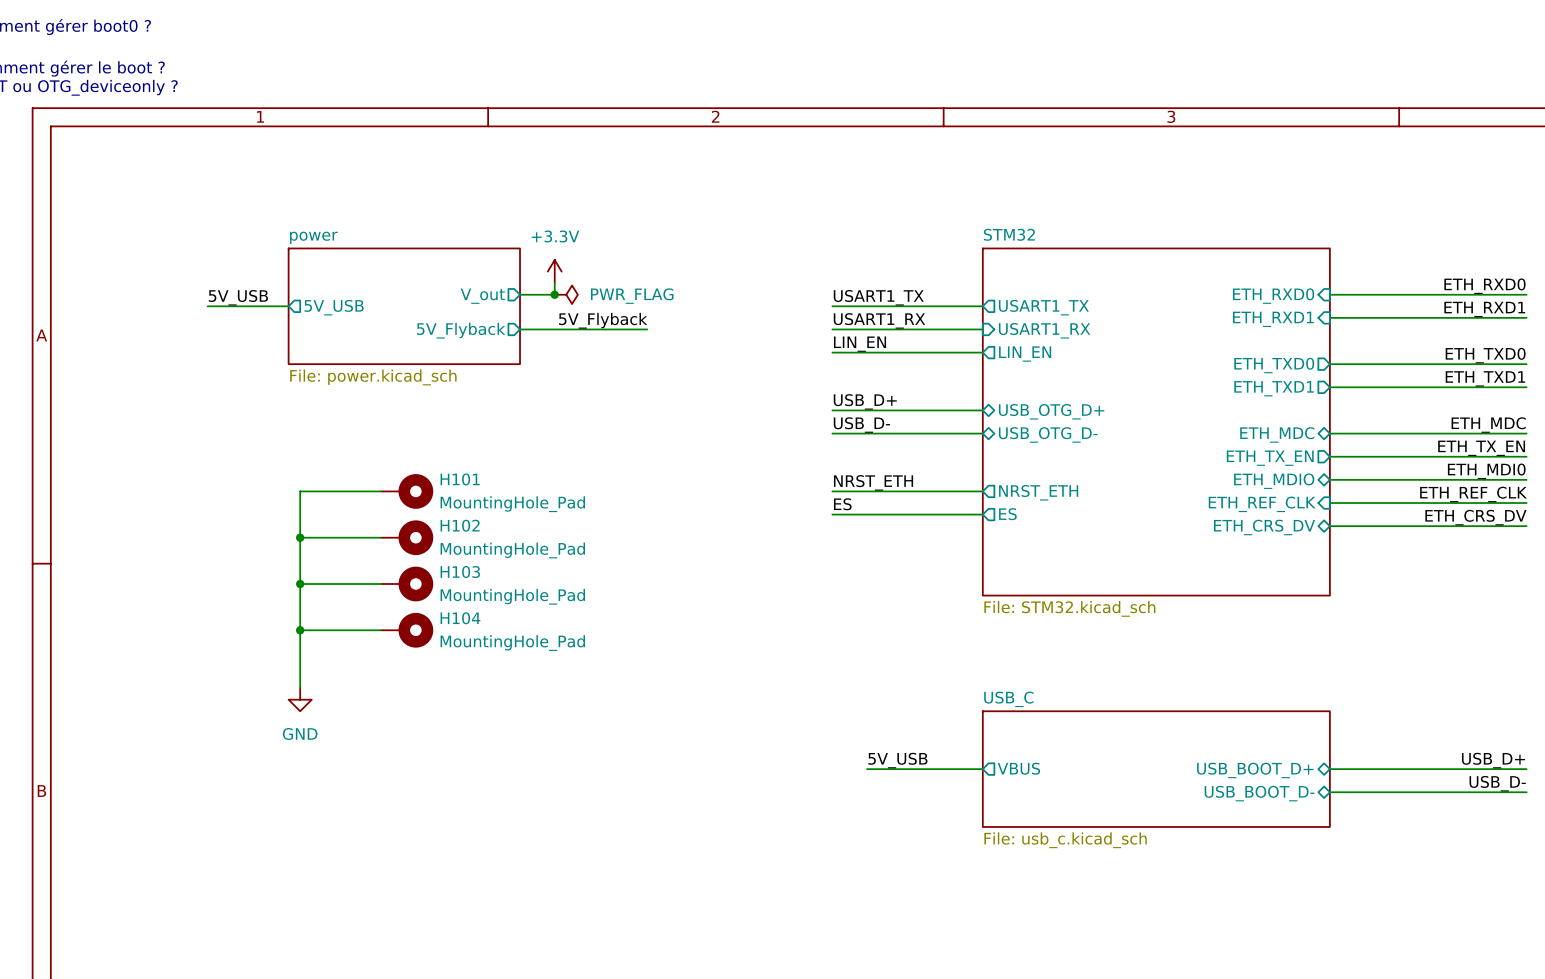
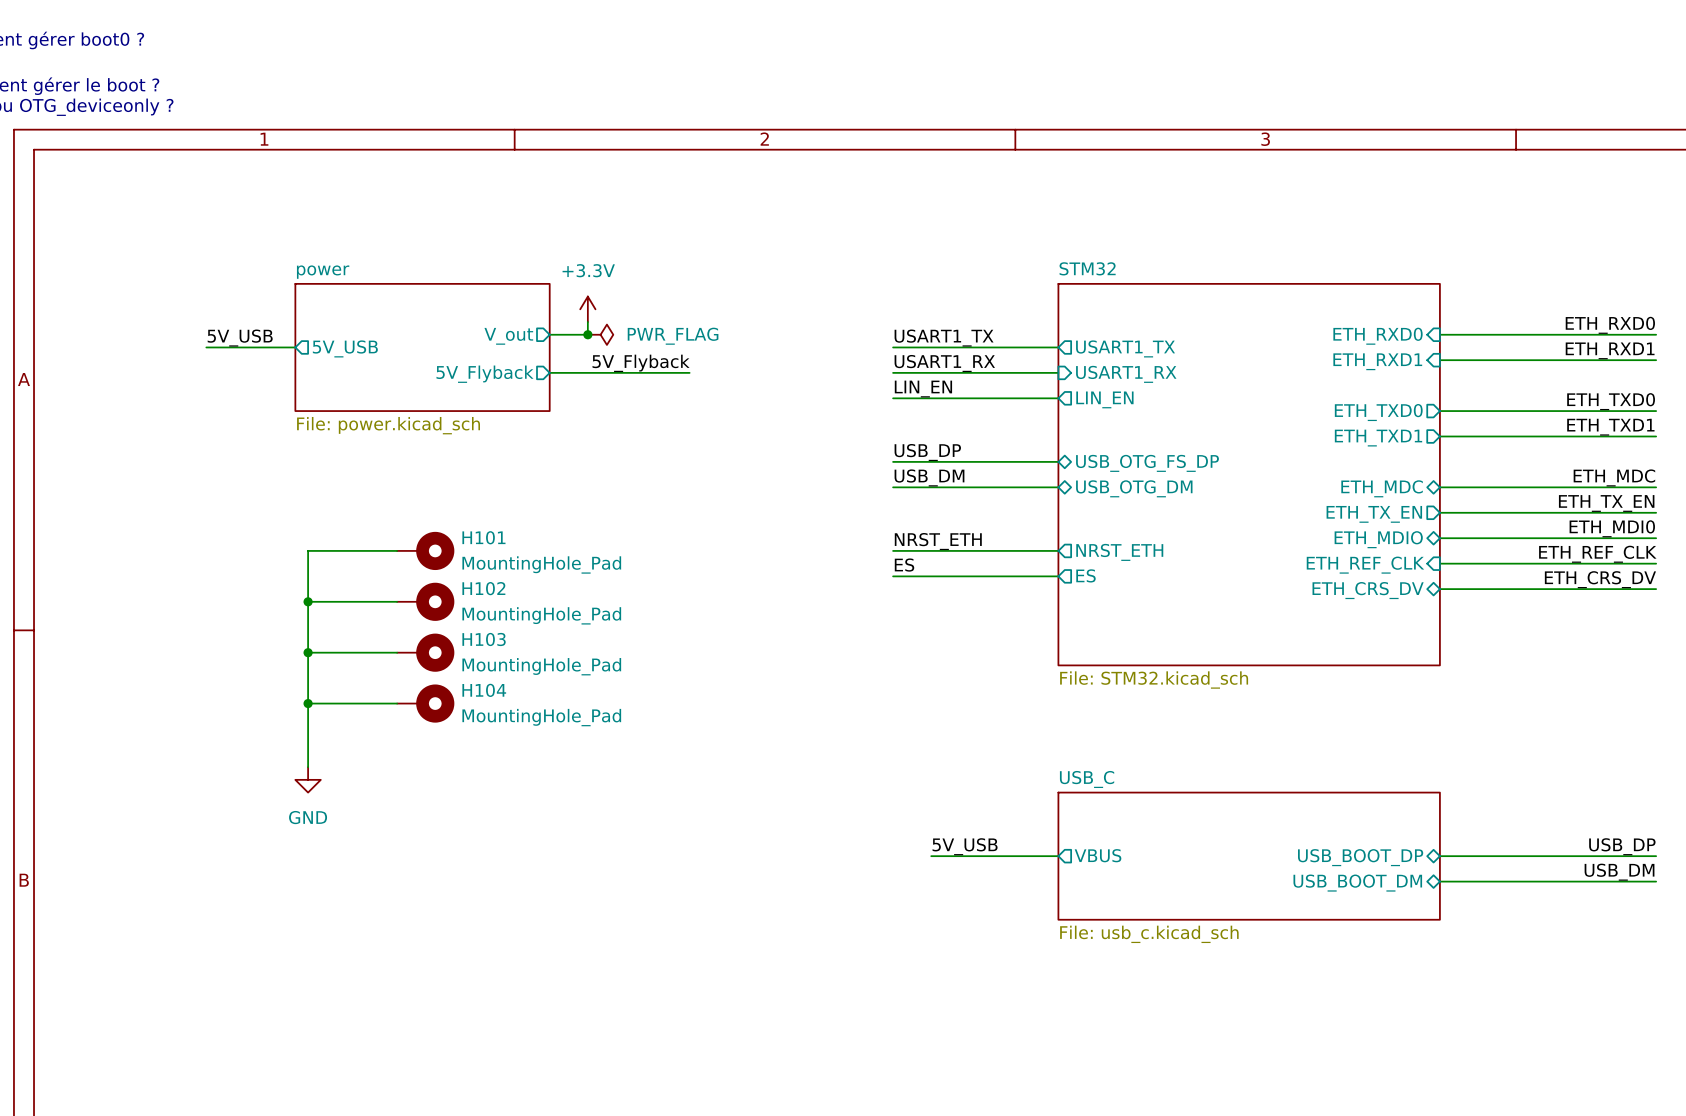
label: USB_D+ (865, 401) -> USB_DP (927, 452)
sheet pin: USB_OTG_D+ (1051, 411) -> USB_OTG_FS_DP (1147, 463)
label: USB_D- (861, 425) -> USB_DM (929, 477)
sheet pin: USB_OTG_D- (1048, 434) -> USB_OTG_DM (1134, 488)
label: USB_D+ (1493, 760) -> USB_DP (1622, 846)
sheet pin: USB_BOOT_D+ (1255, 770) -> USB_BOOT_DP (1360, 857)
label: USB_D- (1497, 783) -> USB_DM (1619, 872)
sheet pin: USB_BOOT_D- (1259, 793) -> USB_BOOT_DM (1357, 883)

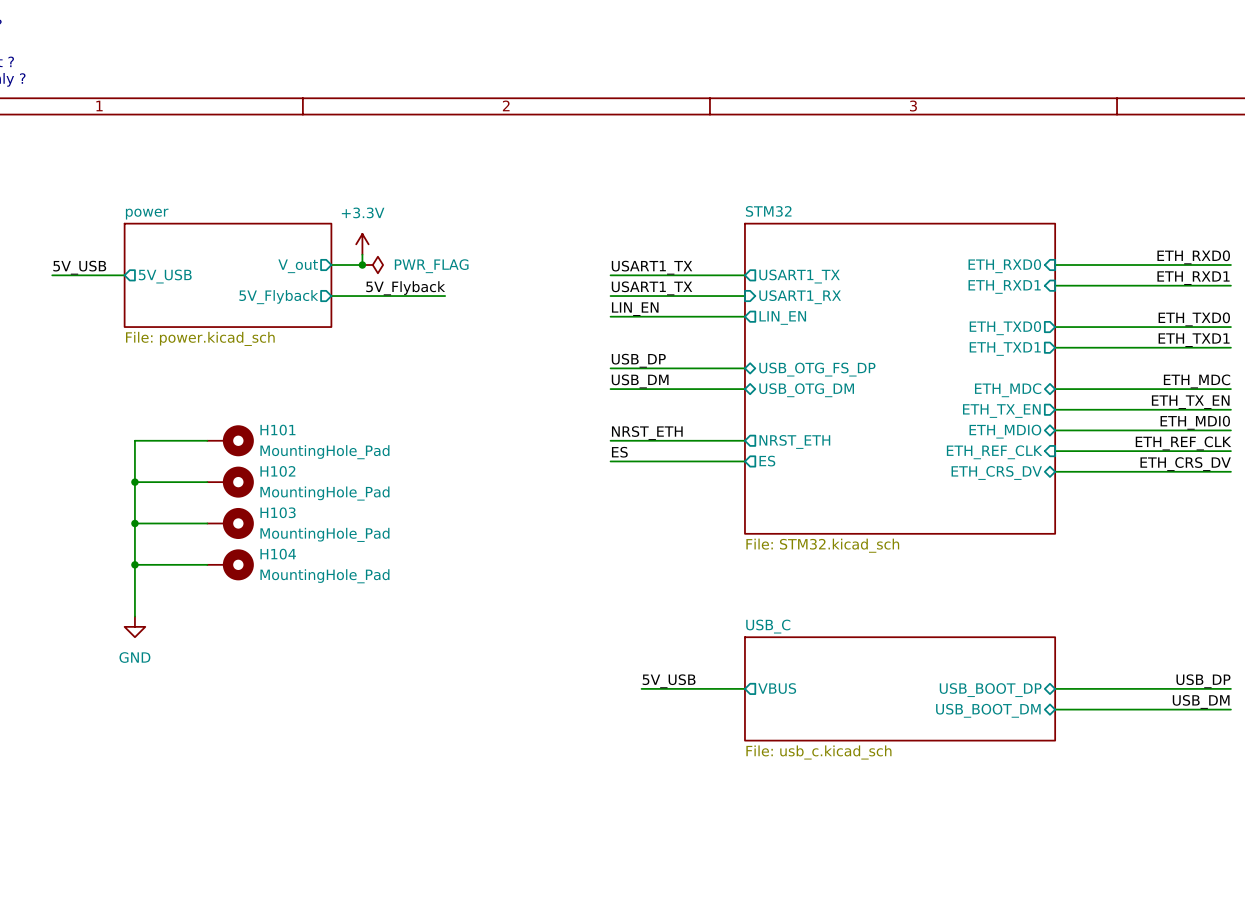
label: USART1_RX (944, 363) -> USART1_TX (652, 288)

